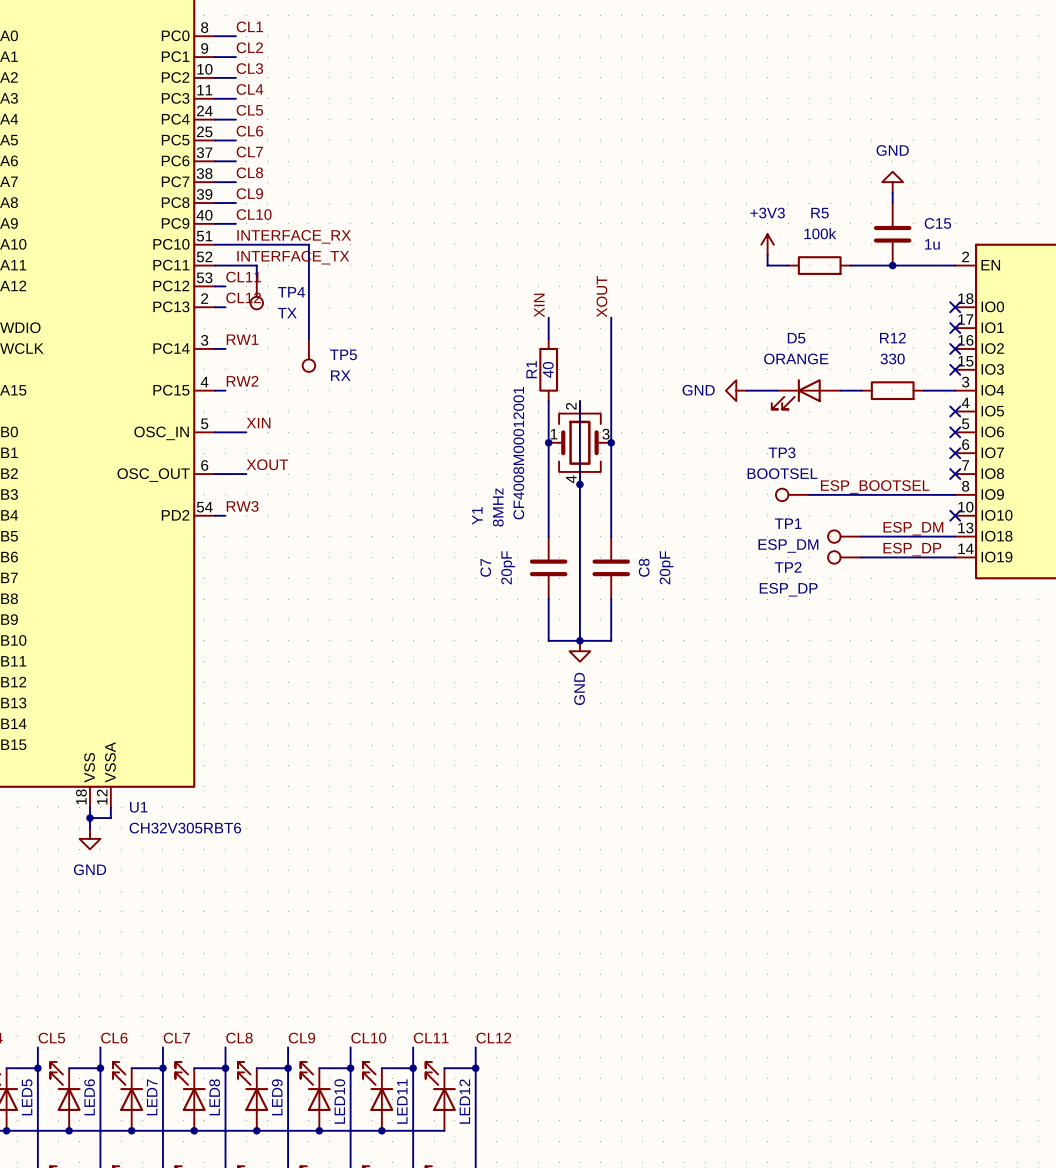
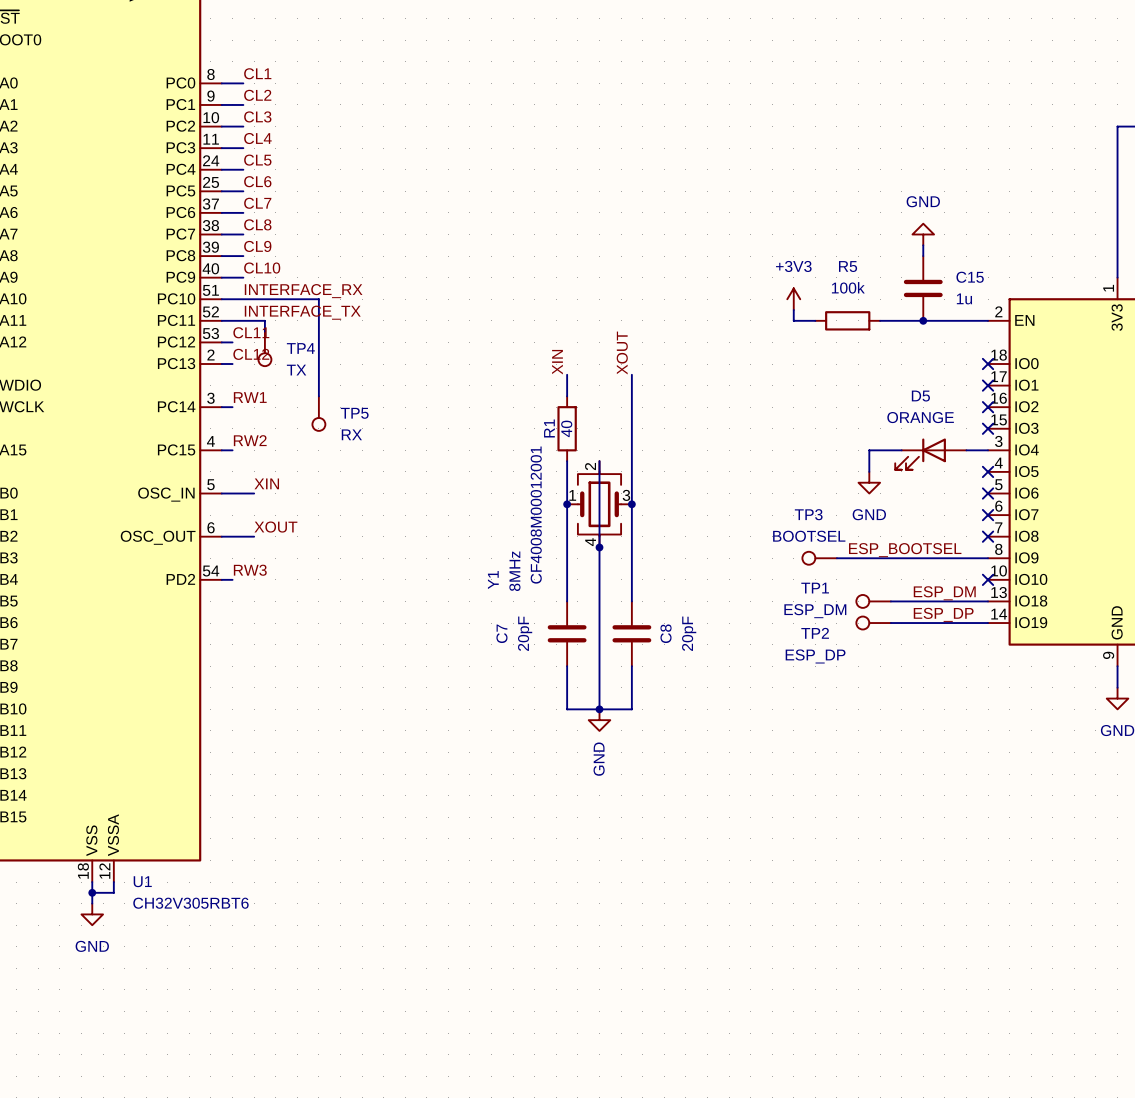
power symbol rotation: 0° (736, 390) -> 90° counterclockwise (869, 482)
power symbol position: GND (736, 390) -> GND (869, 482)
wire: (746, 390) (778, 390) -> none
wire: none -> (869, 450) (869, 471)
R12: 330 (892, 390) -> none
D5 position: (806, 394) -> (930, 454)

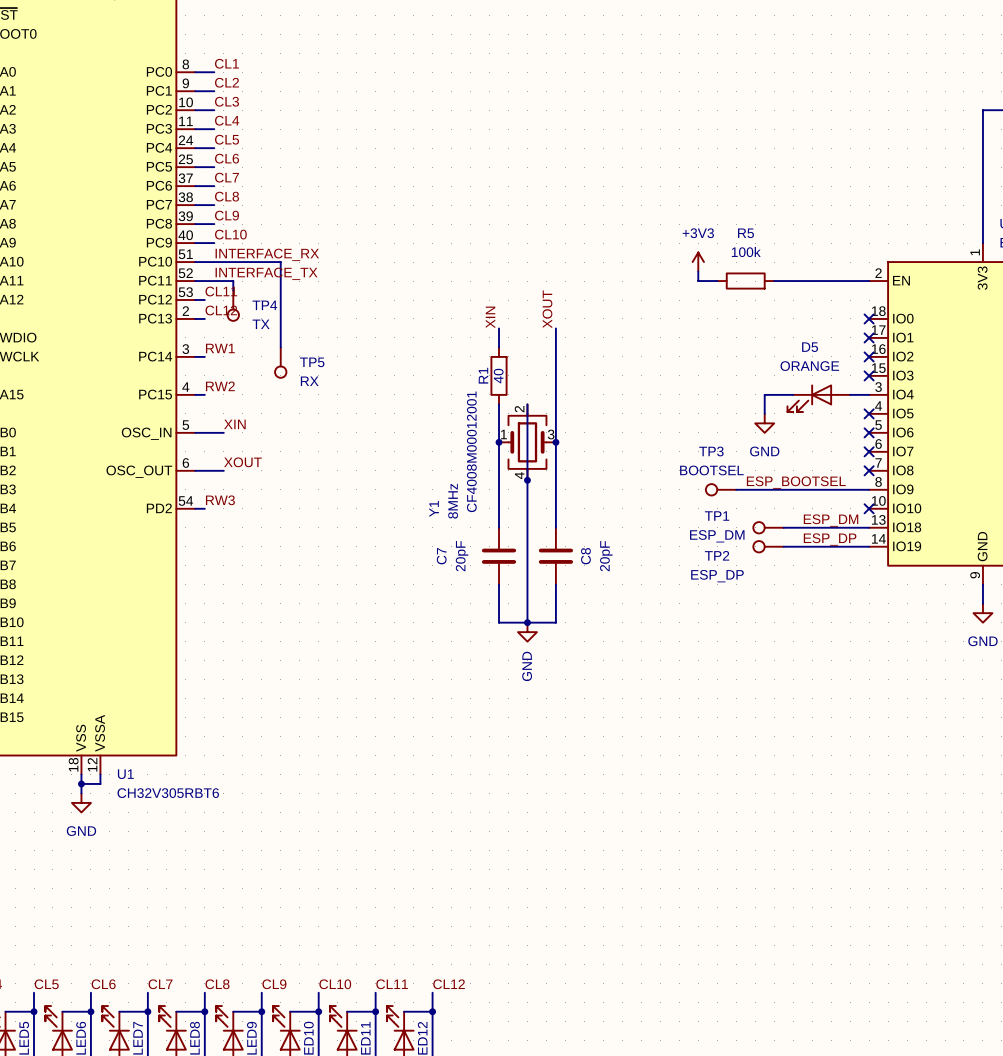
power symbol: GND (923, 234) -> none
wire: (923, 245) (923, 256) -> none
C15: 1u (923, 288) -> none
junction: (923, 320) -> none

